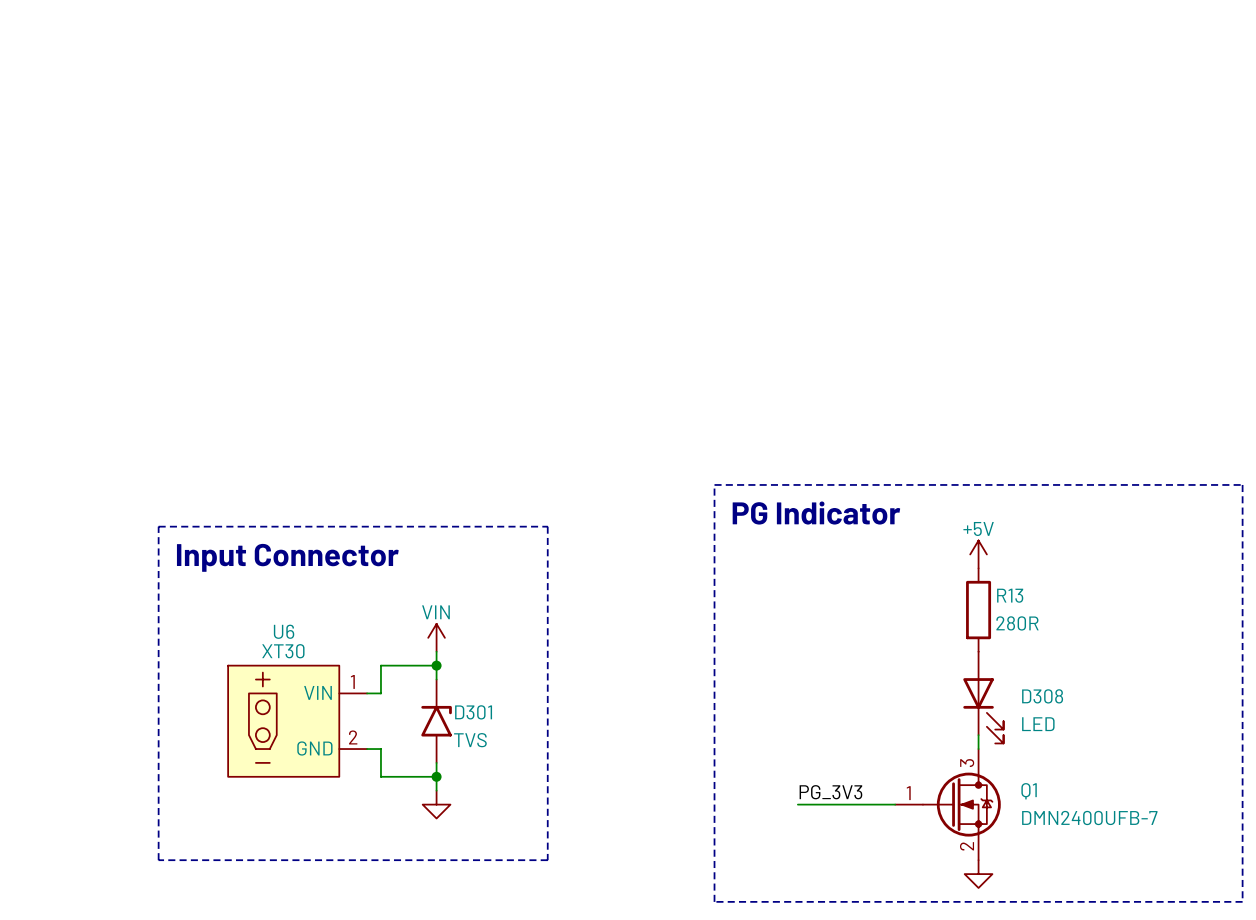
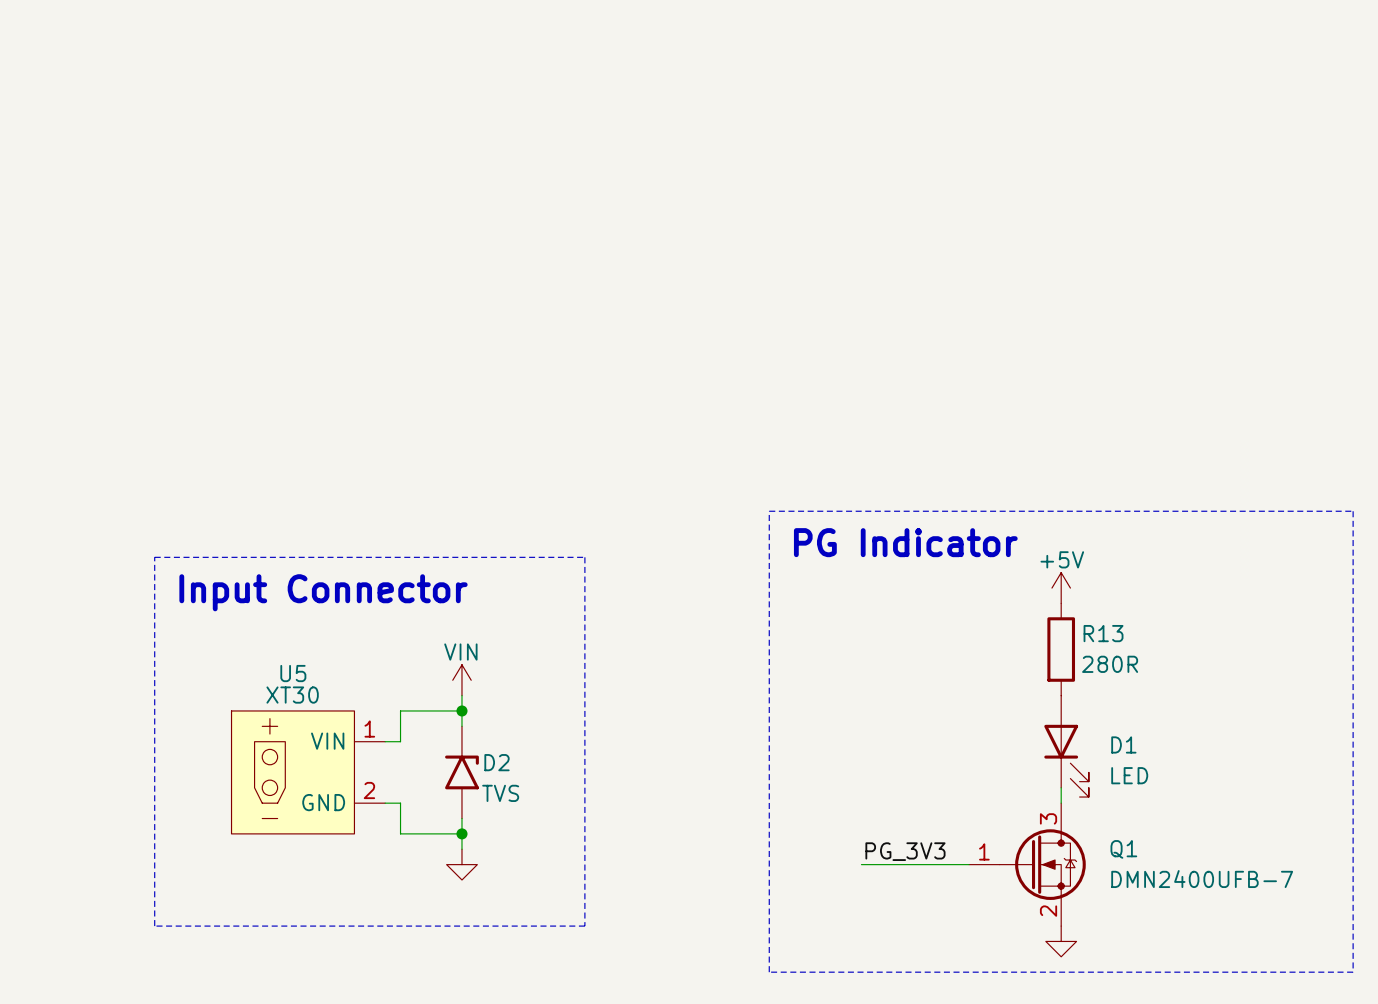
U6 name: U6 (284, 631) -> U5 (293, 673)
D308 name: D308 (1042, 696) -> D1 (1123, 744)
D301 name: D301 (473, 712) -> D2 (497, 762)

